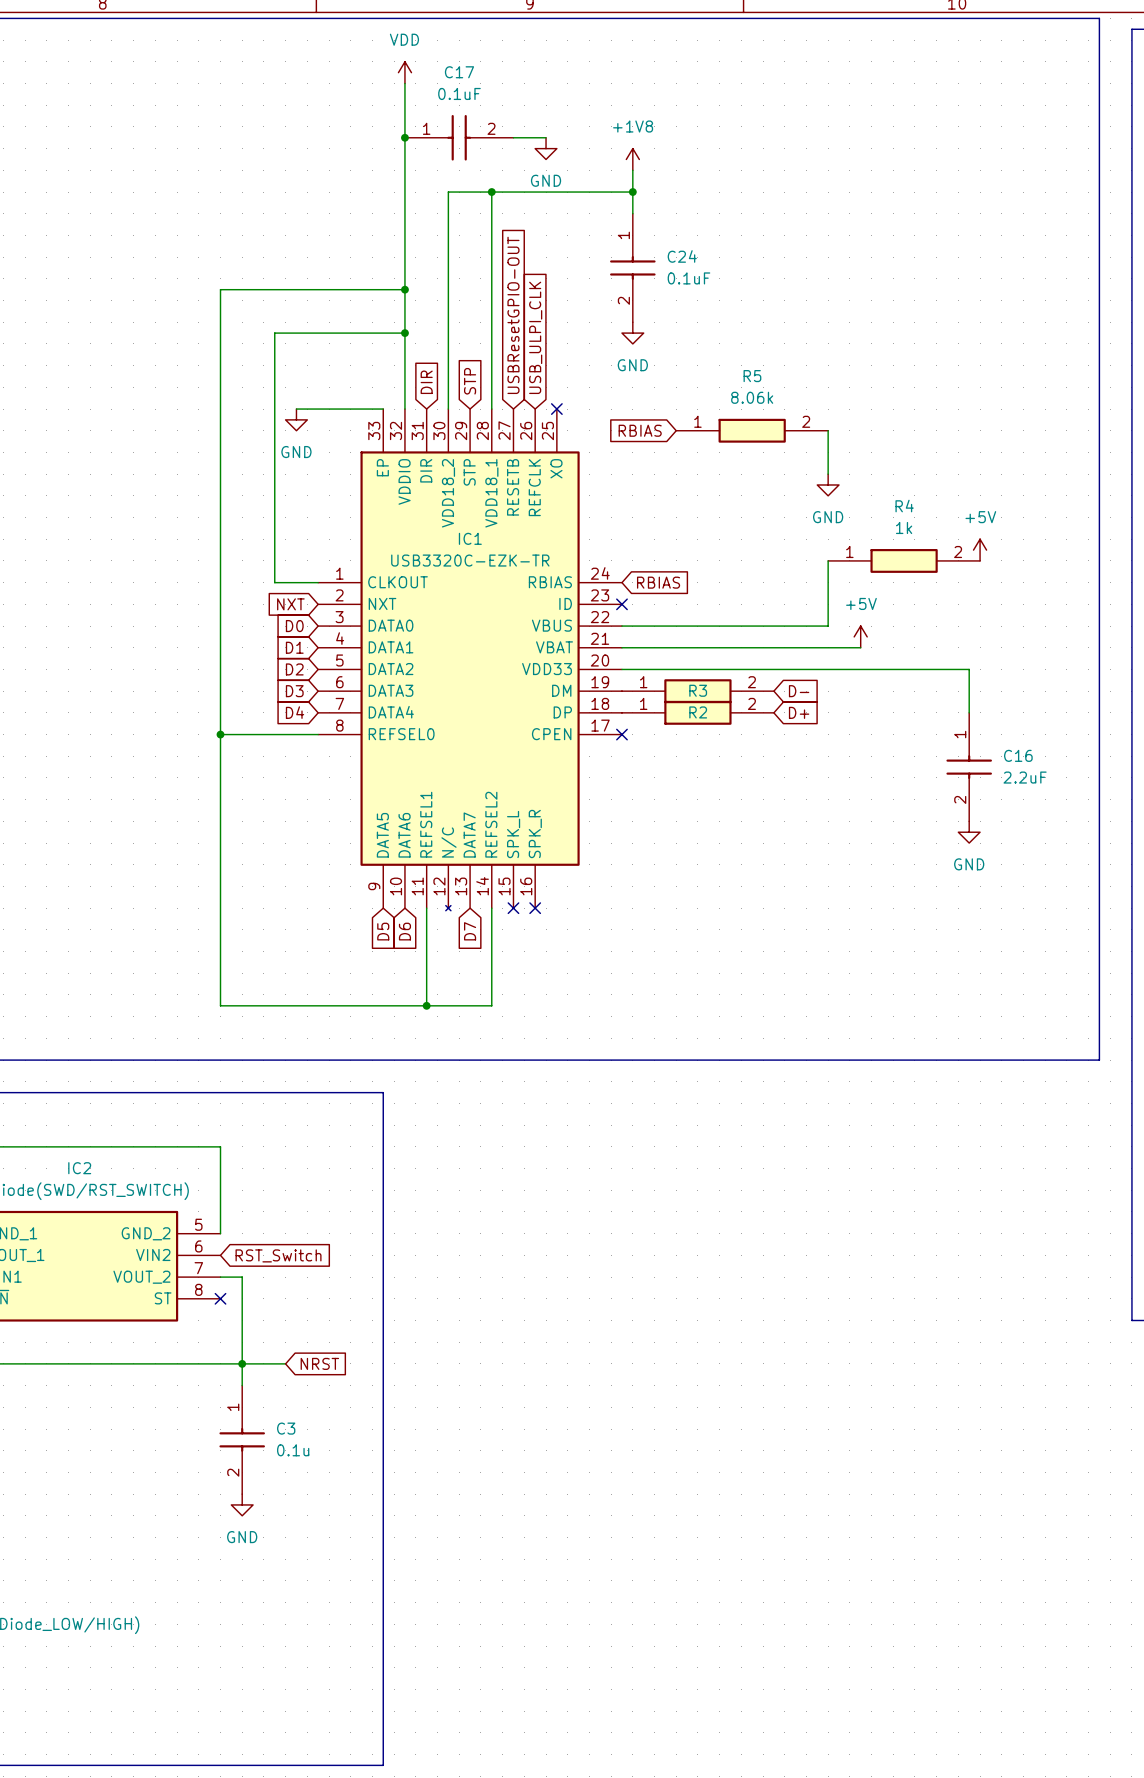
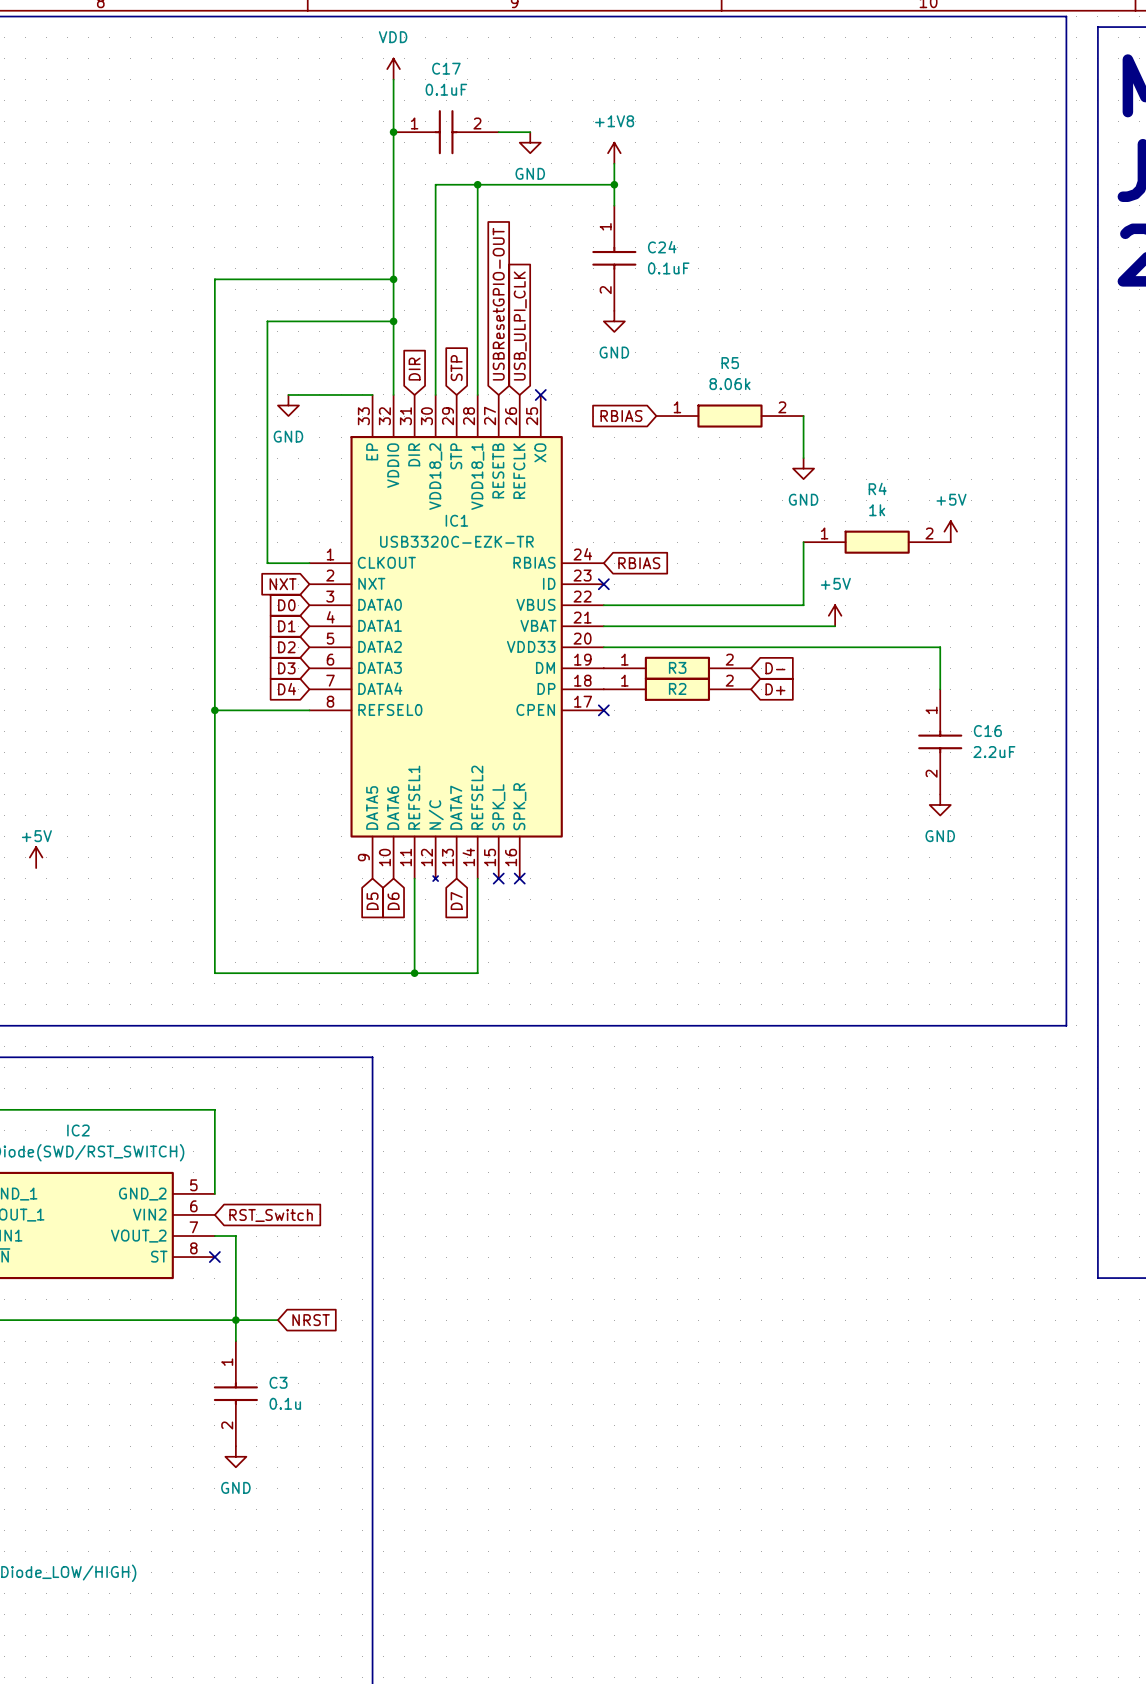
power symbol: none -> +5V (36, 857)

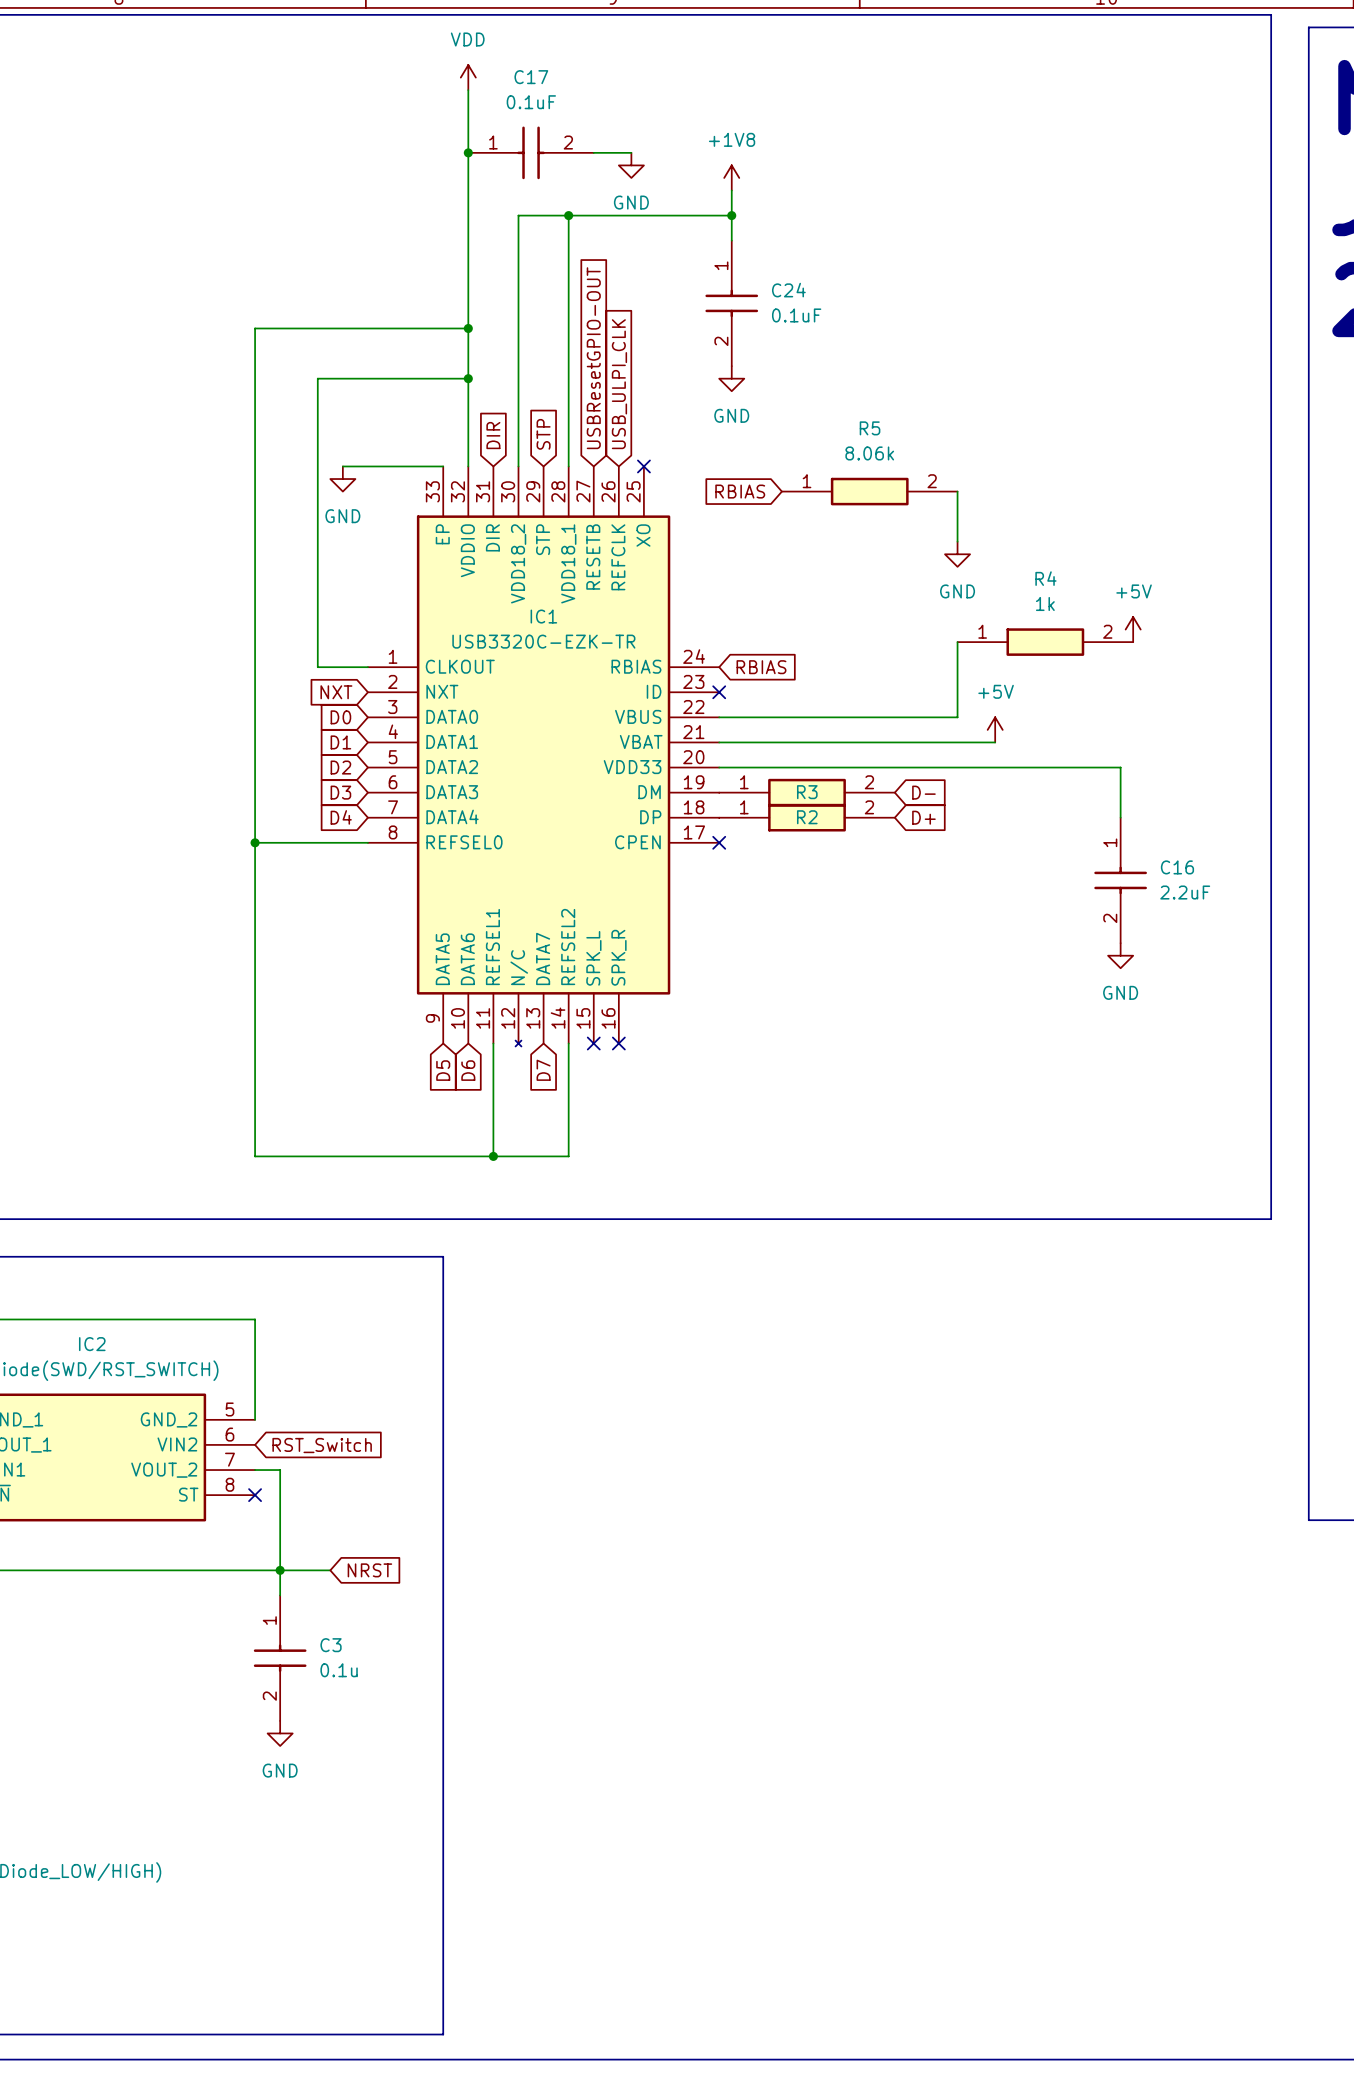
power symbol: +5V (36, 857) -> none

